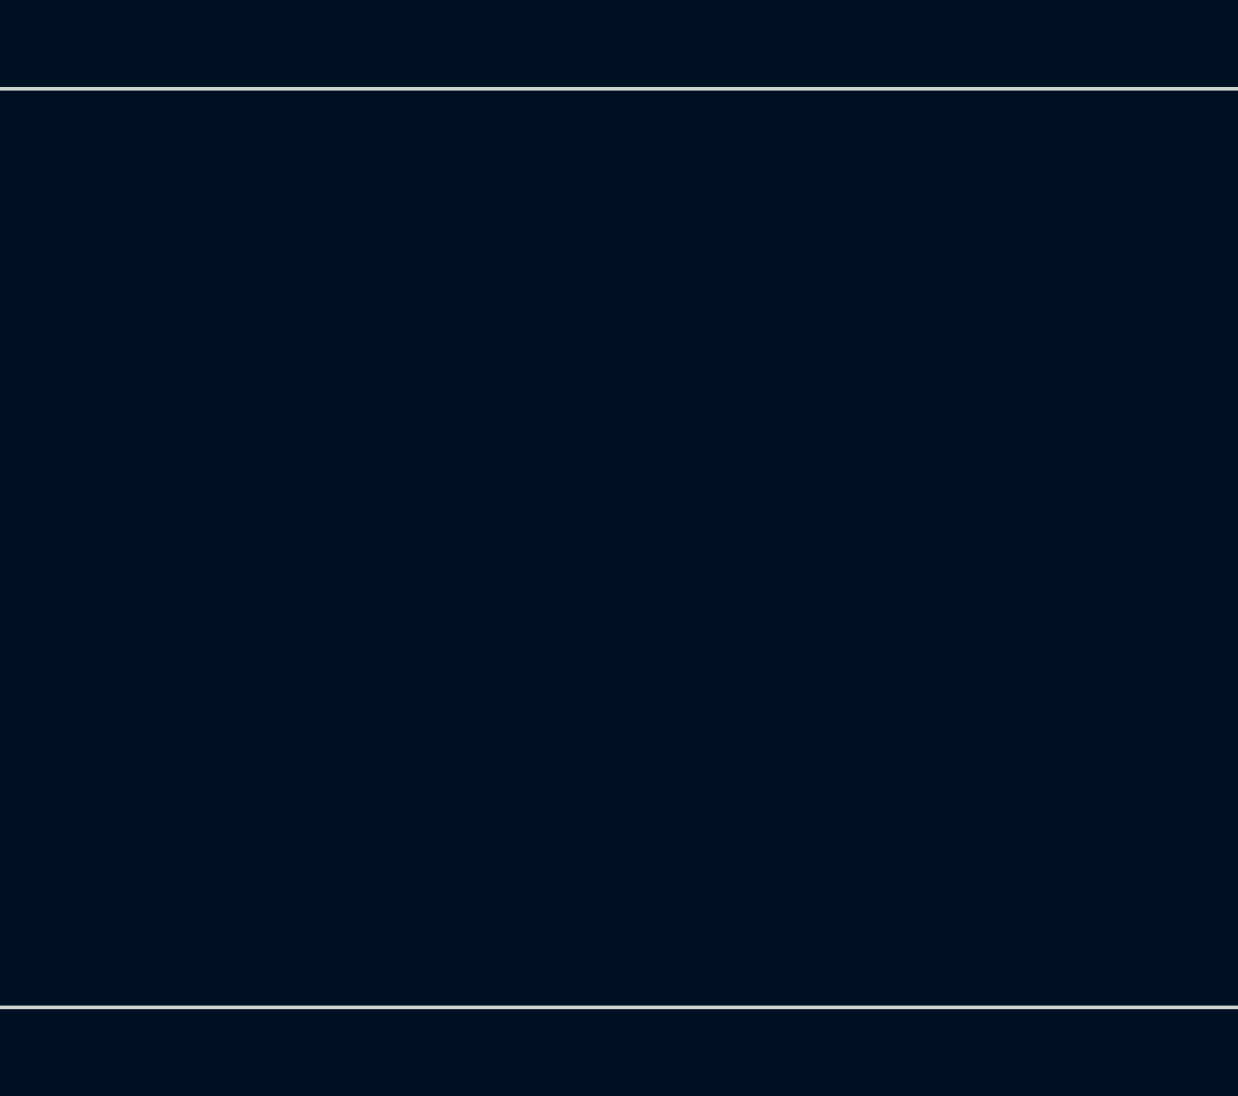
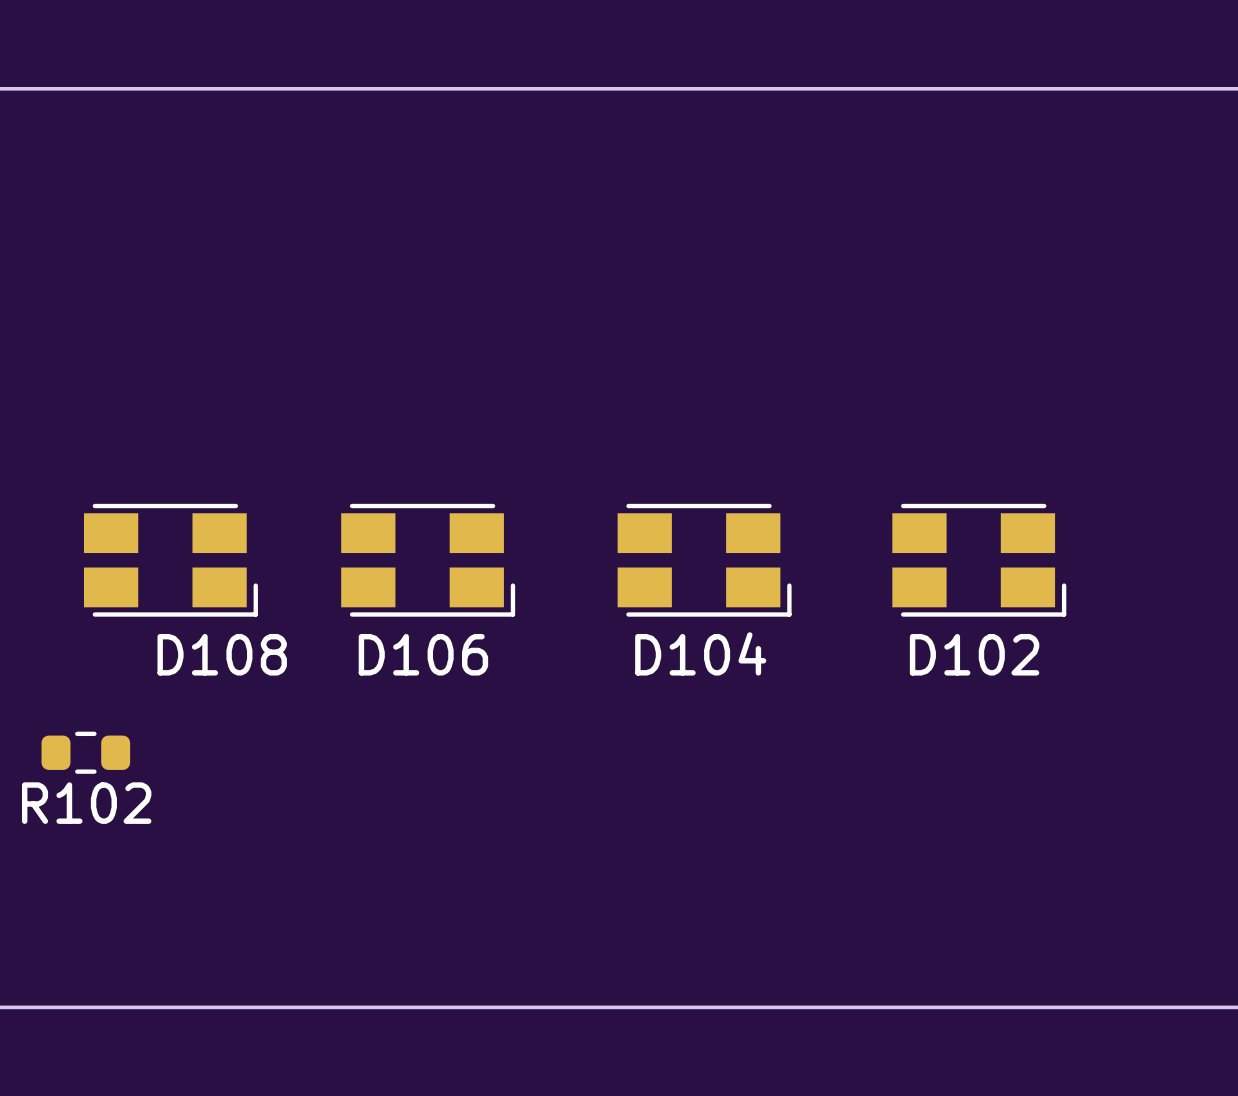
D108: none -> (170, 560)
D106: none -> (428, 560)
D104: none -> (704, 560)
D102: none -> (979, 560)
R102: none -> (85, 752)

